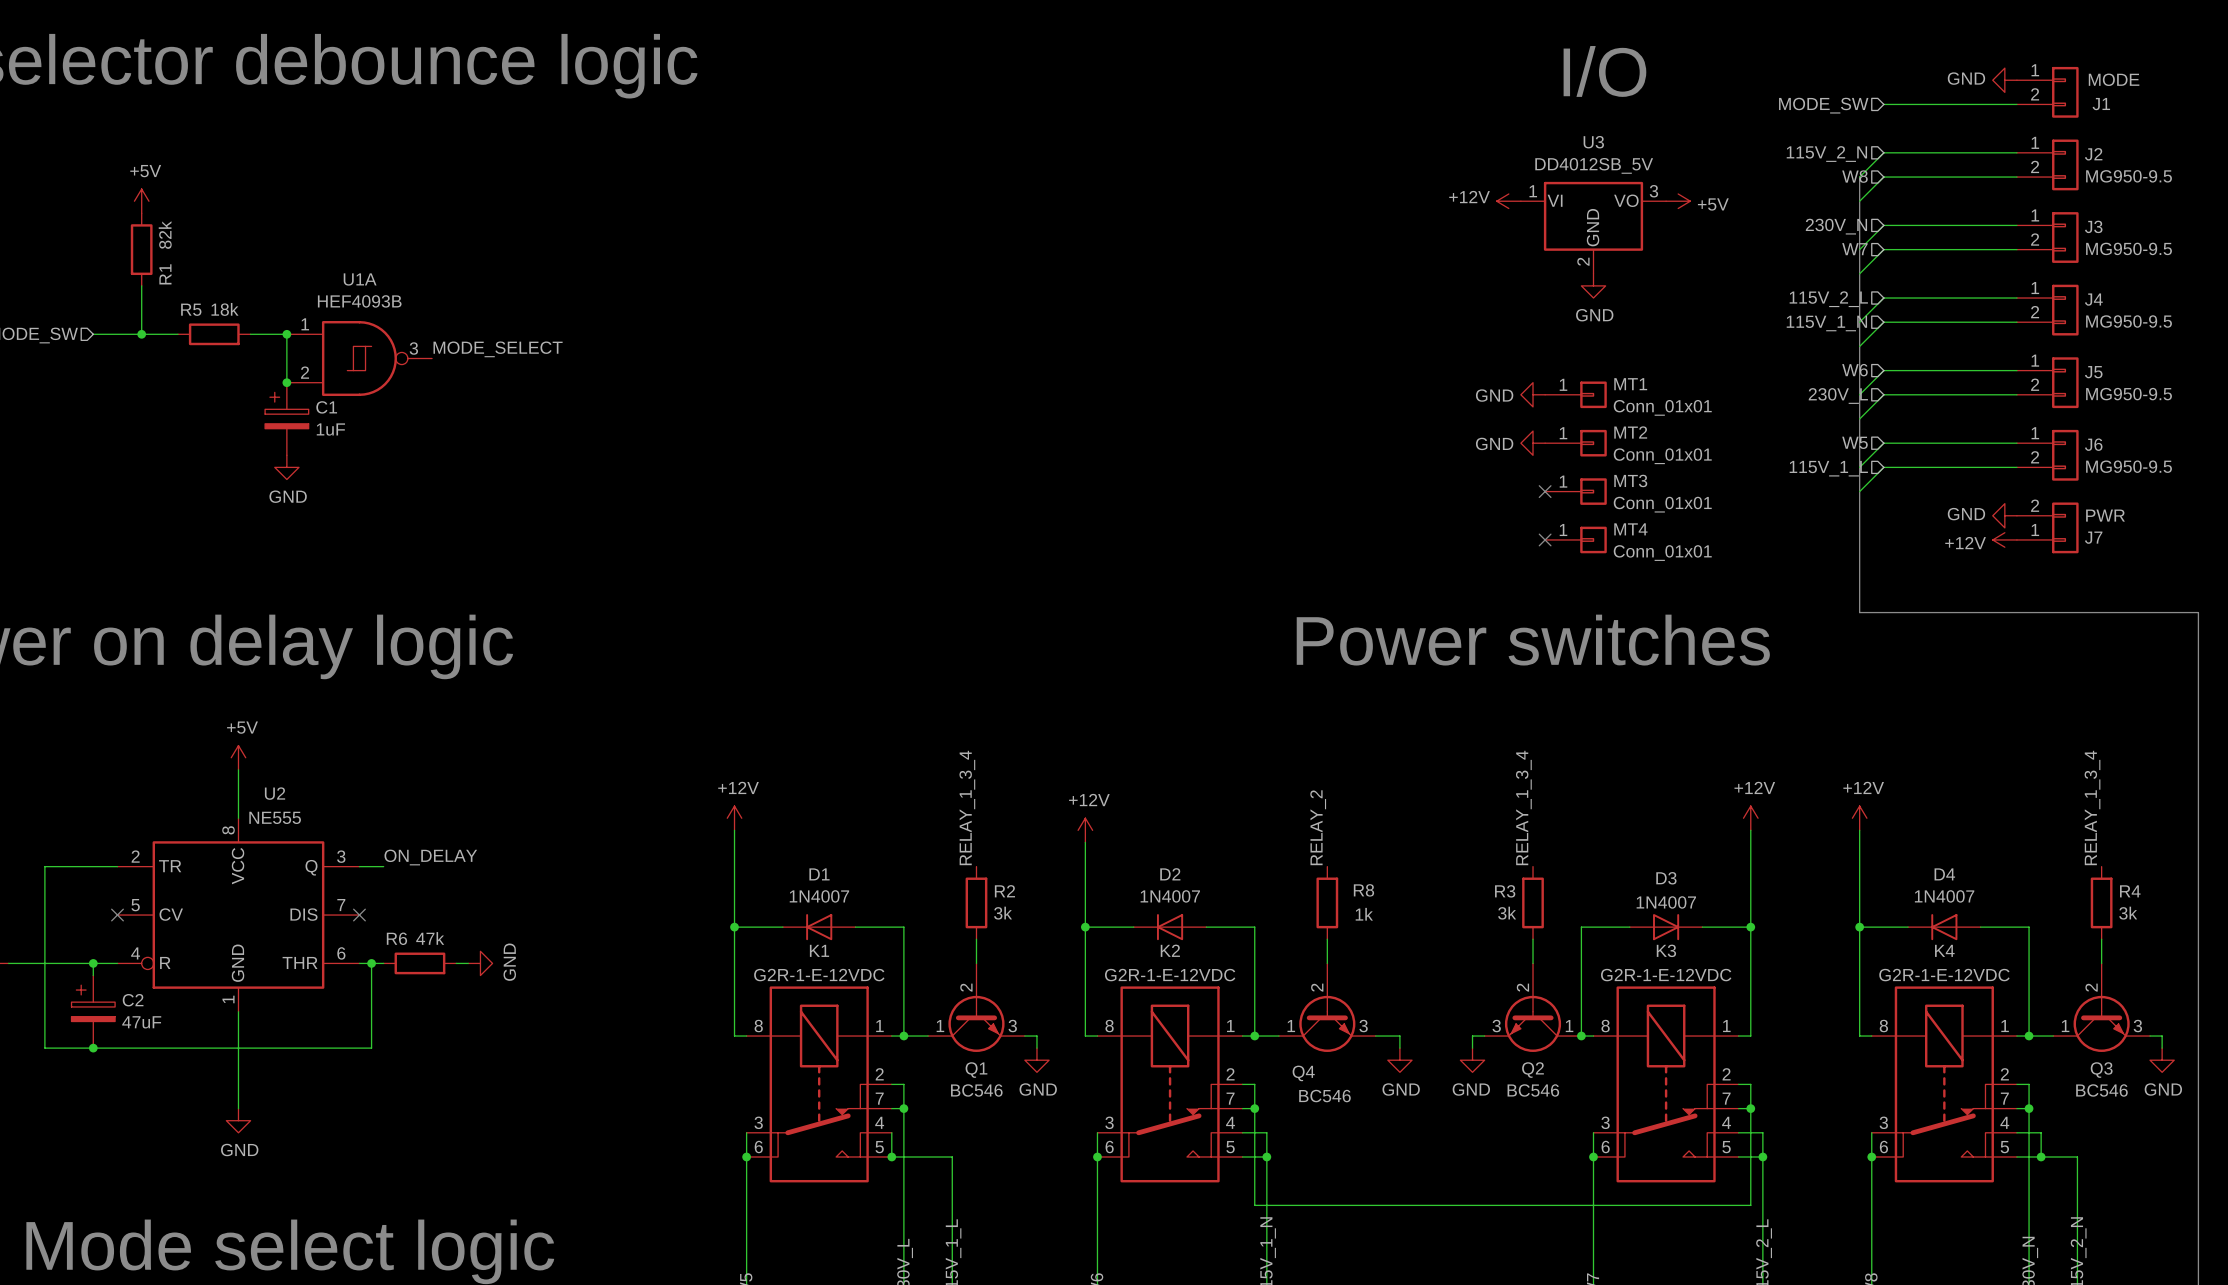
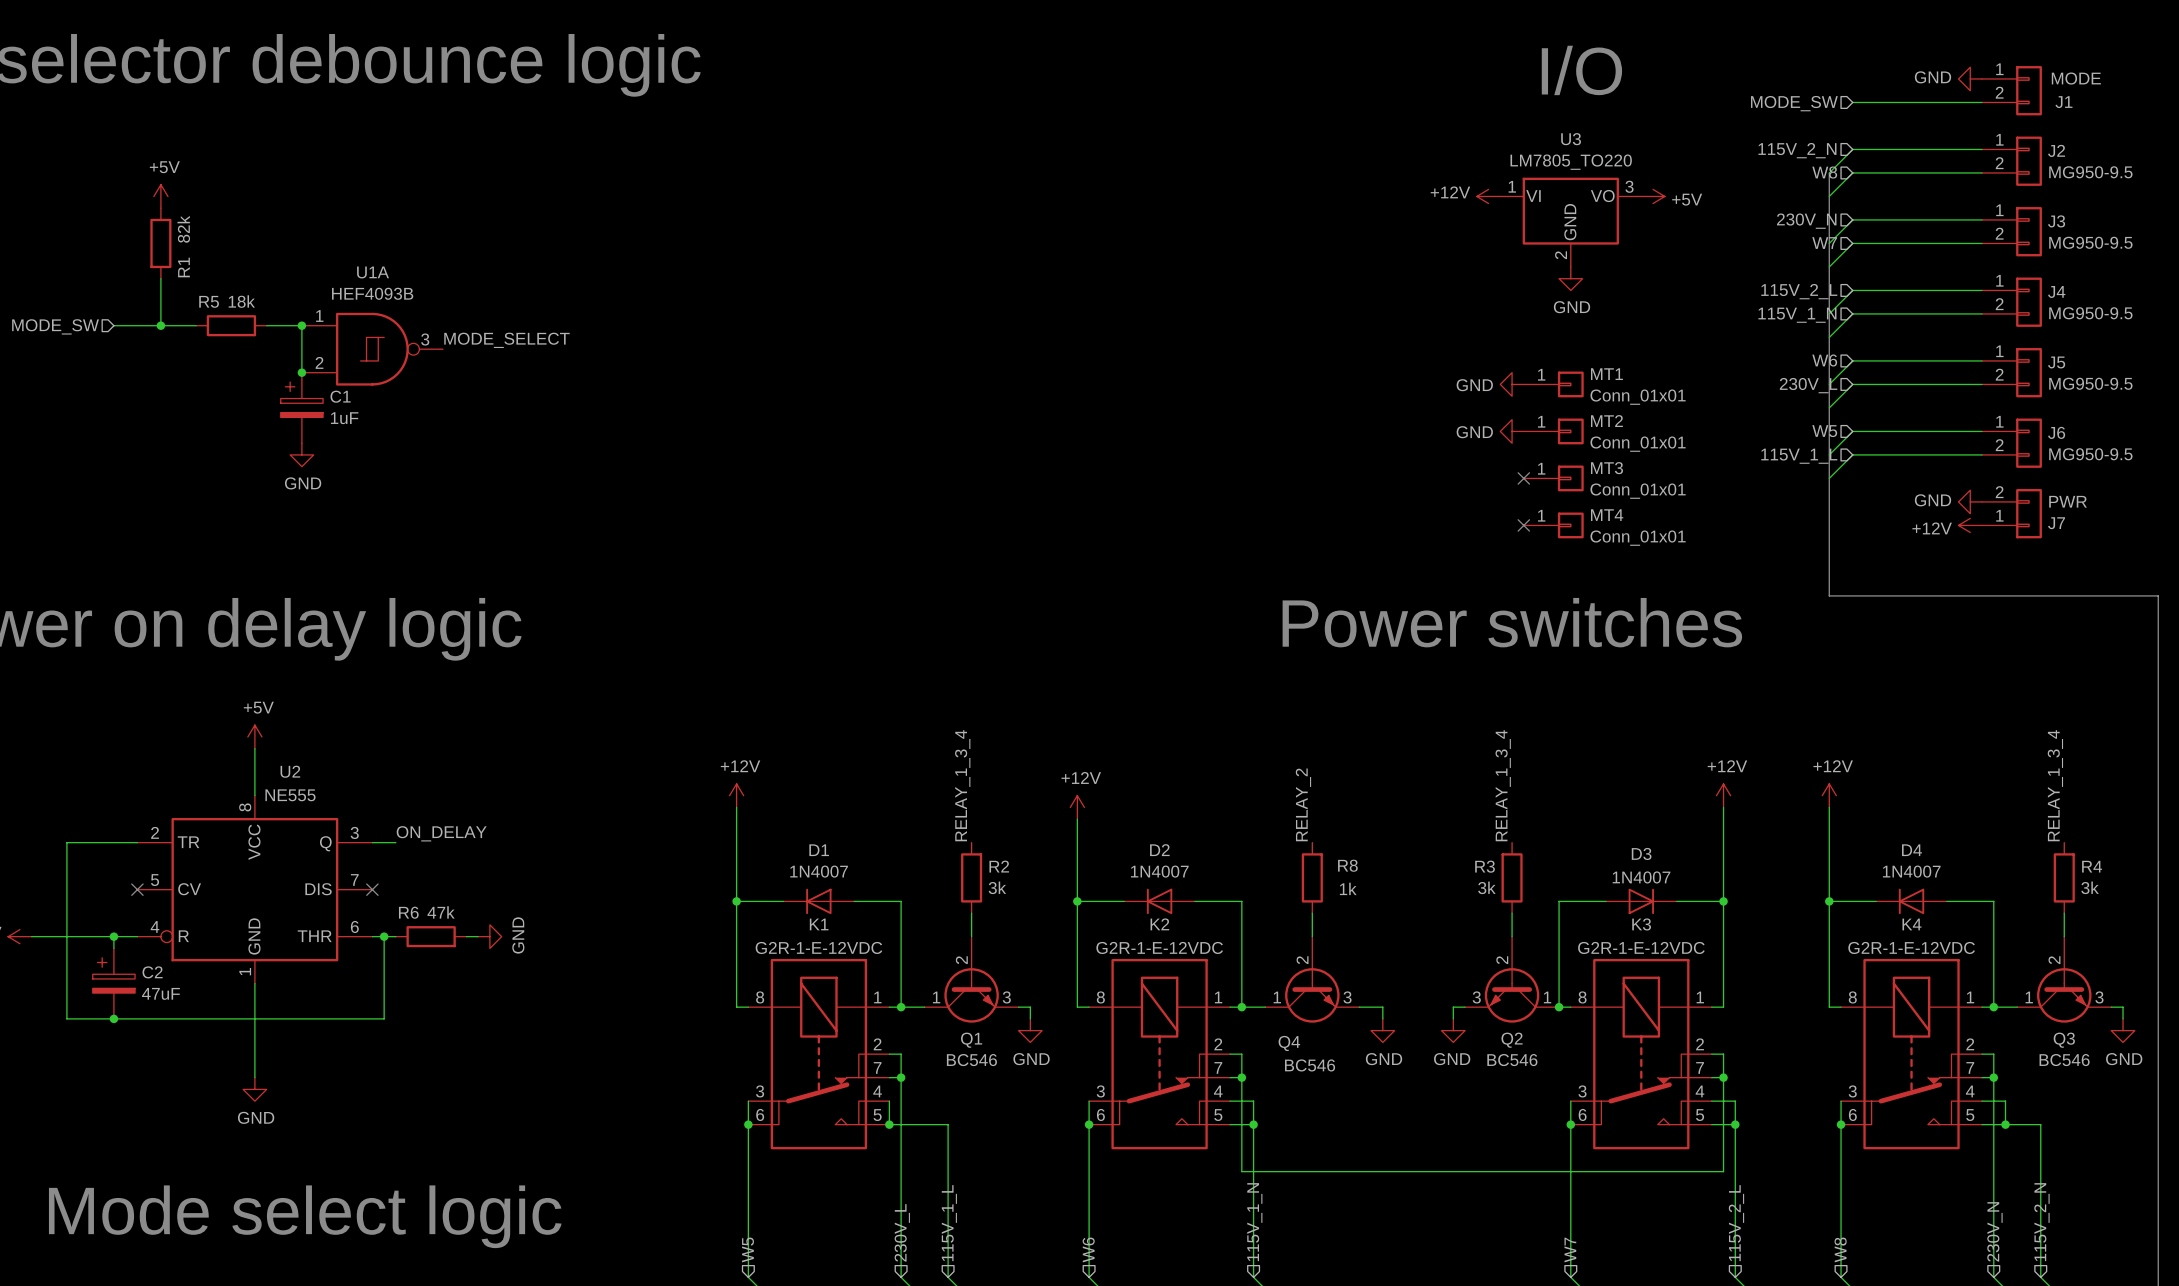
U3 value: DD4012SB_5V (1594, 165) -> LM7805_TO220 (1571, 162)

